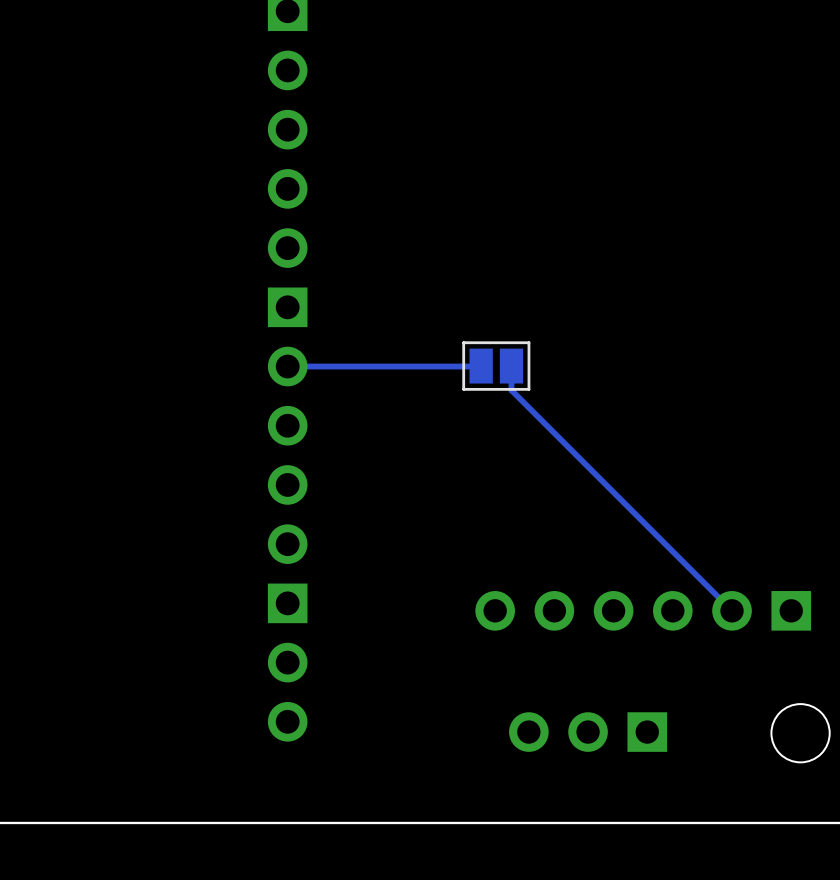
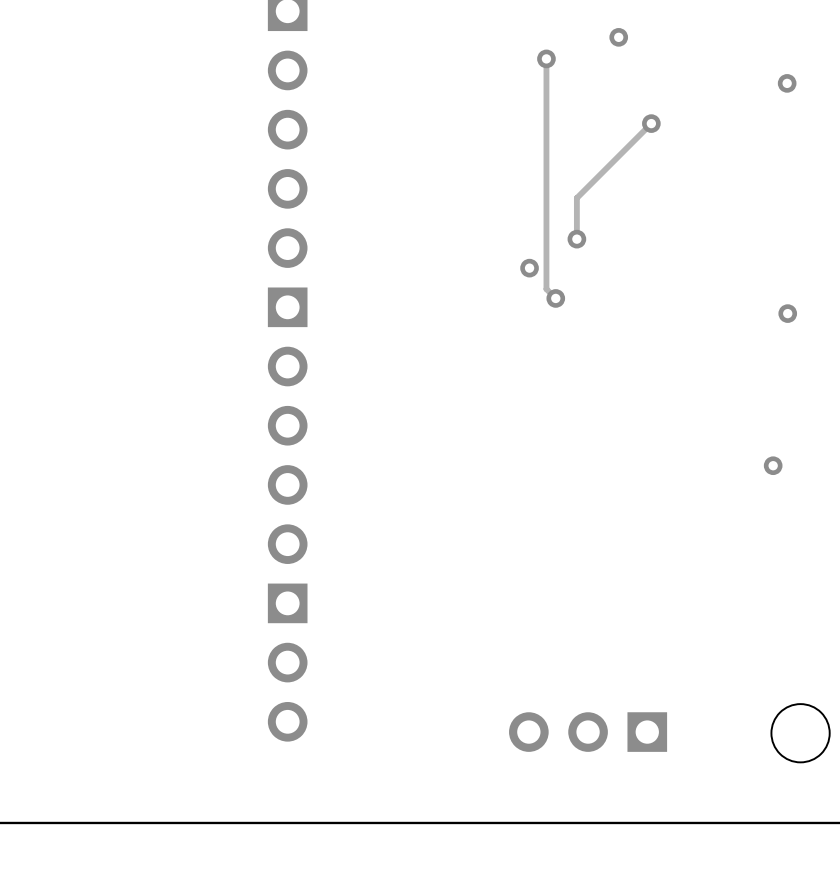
via: none -> (618, 37)
track: none -> (546, 58) (546, 289) (555, 298)
via: none -> (546, 58)
via: none -> (787, 83)
track: none -> (651, 123) (576, 198) (576, 239)
via: none -> (651, 123)
via: none -> (576, 239)
via: none -> (529, 268)
via: none -> (555, 298)
via: none -> (787, 313)
track: (481, 366) (287, 366) -> none
part: (496, 366) -> none
track: (511, 366) (511, 390) (732, 610) -> none
via: none -> (773, 465)
part: (643, 610) -> none

